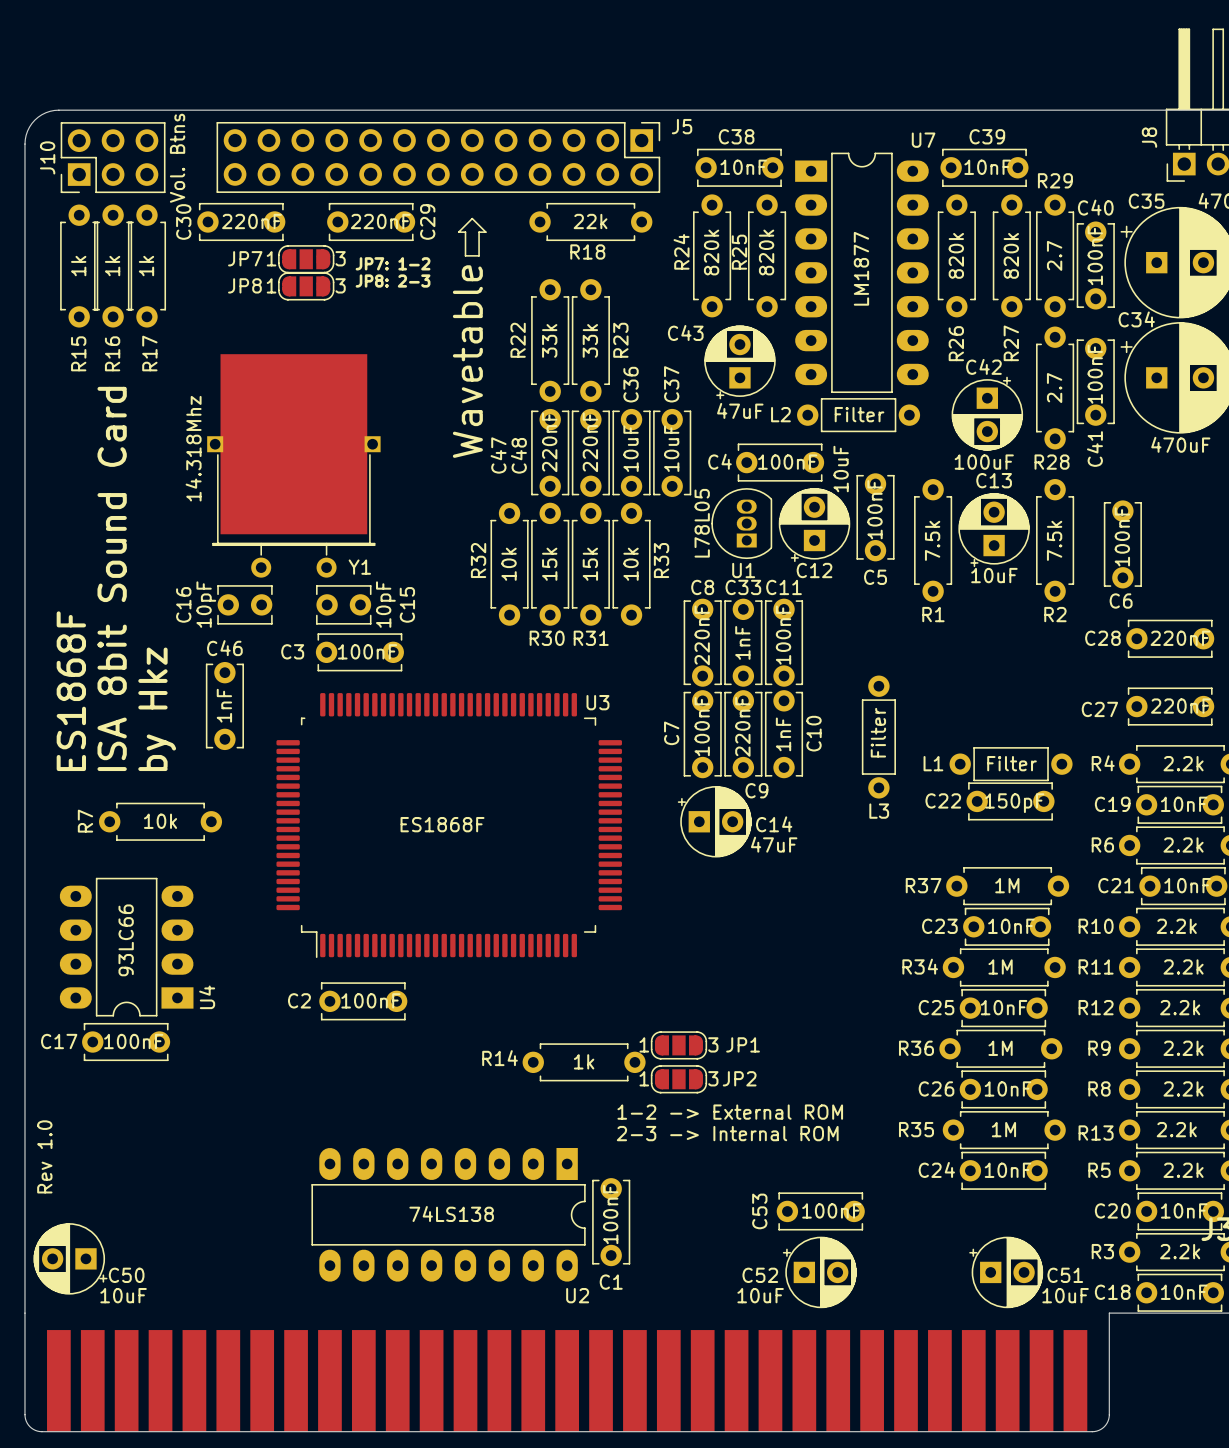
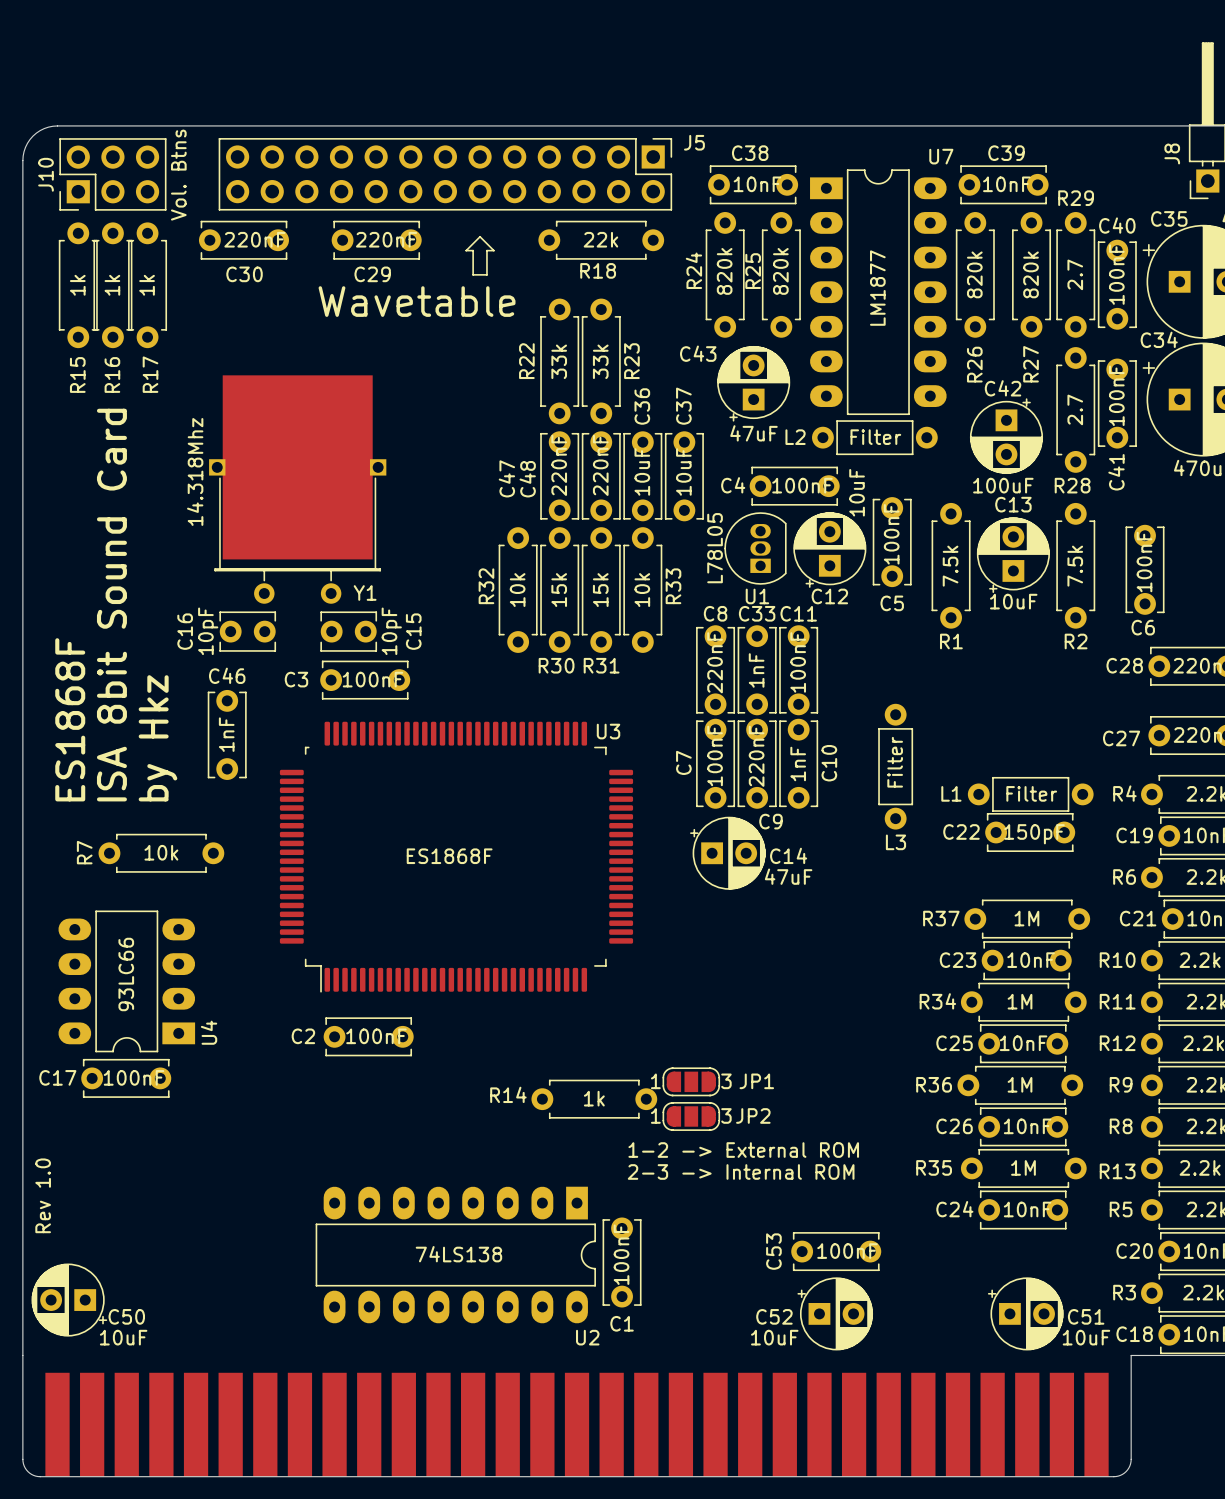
C30 name rotation: 0° (183, 221) -> 90° clockwise (244, 274)
C30 name position: C30 (183, 221) -> C30 (244, 274)
C29 name rotation: 0° (427, 221) -> 90° clockwise (372, 274)
C29 name position: C29 (427, 221) -> C29 (372, 274)
JP7: (306, 259) -> none
text: JP7: 1-2 (393, 263) -> none
text: JP8: 2-3 (393, 281) -> none
JP8: (306, 286) -> none
J5 value rotation: 0° (467, 361) -> 90° clockwise (417, 301)

